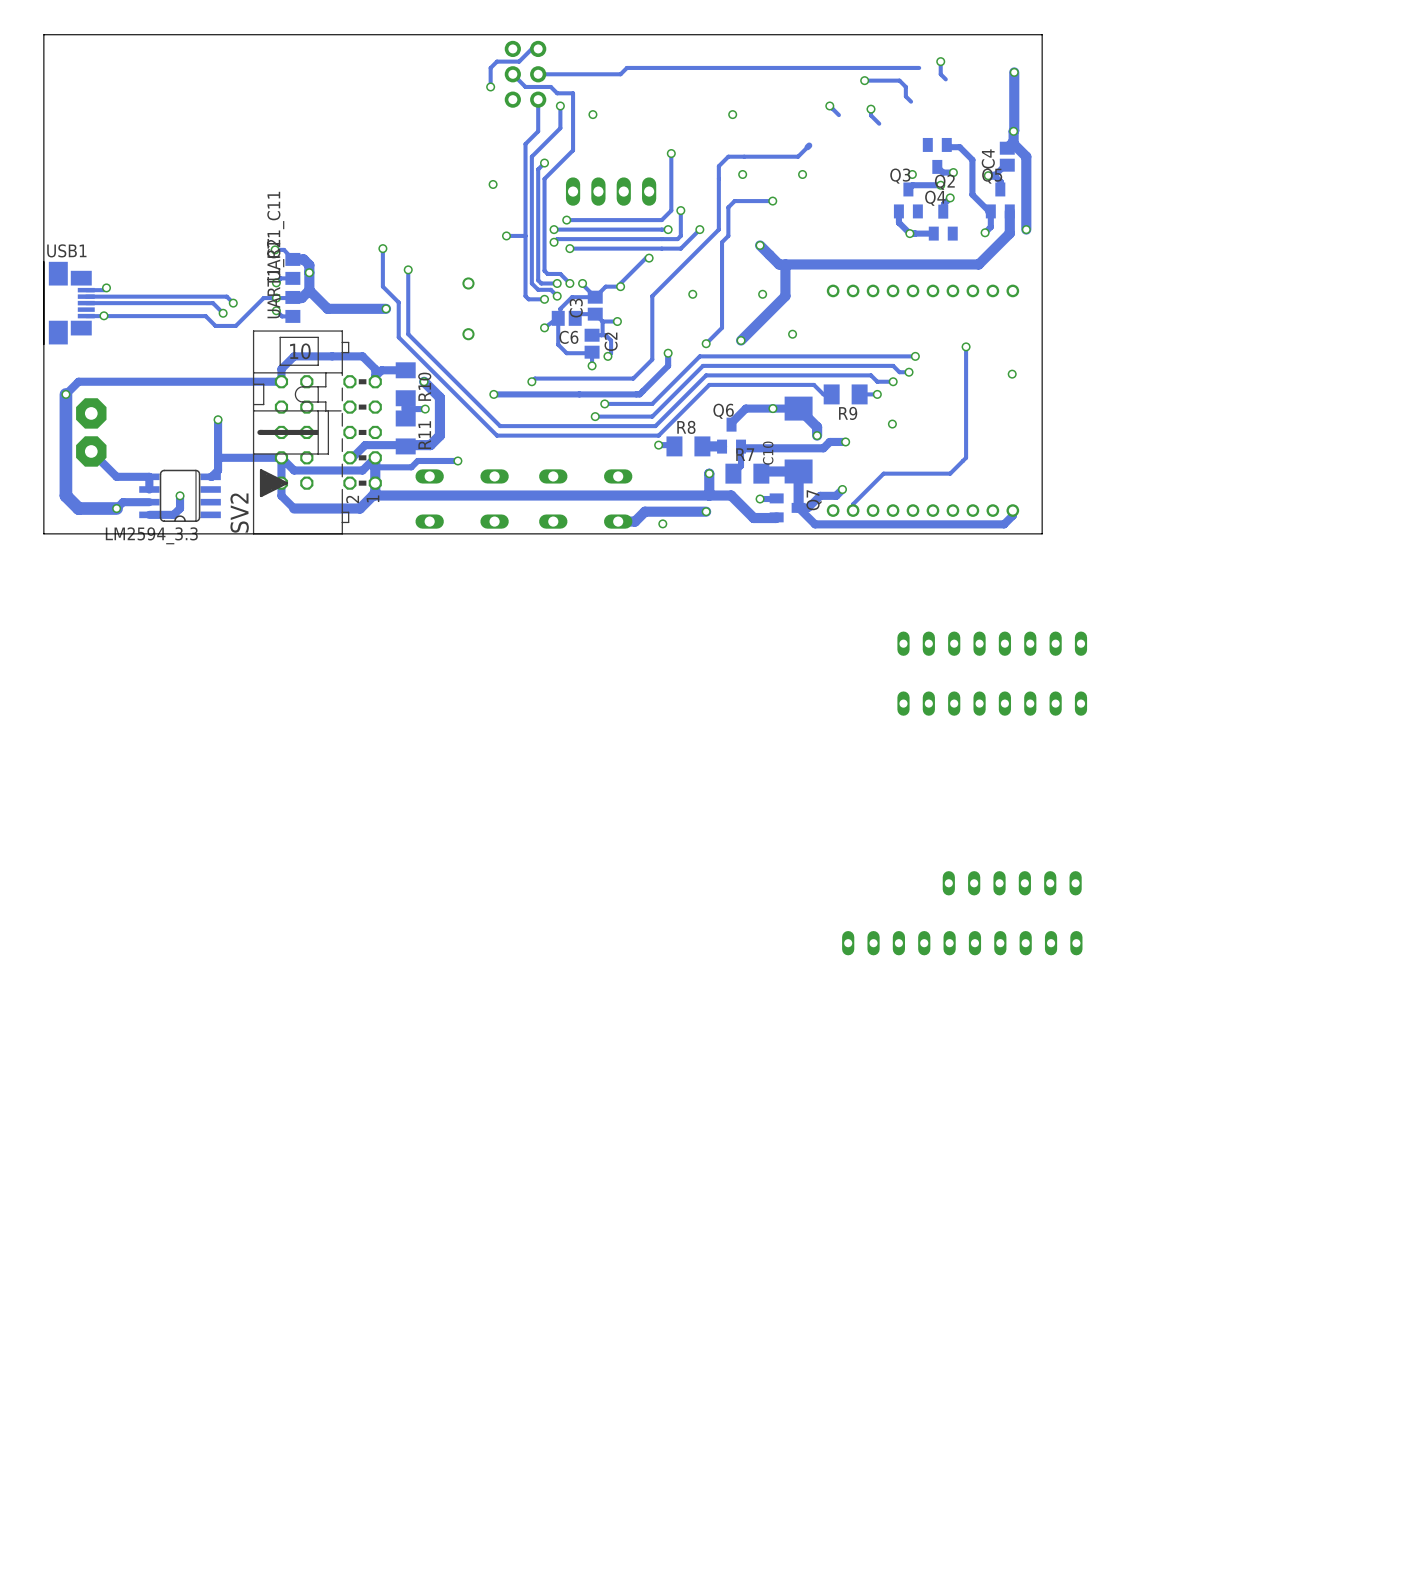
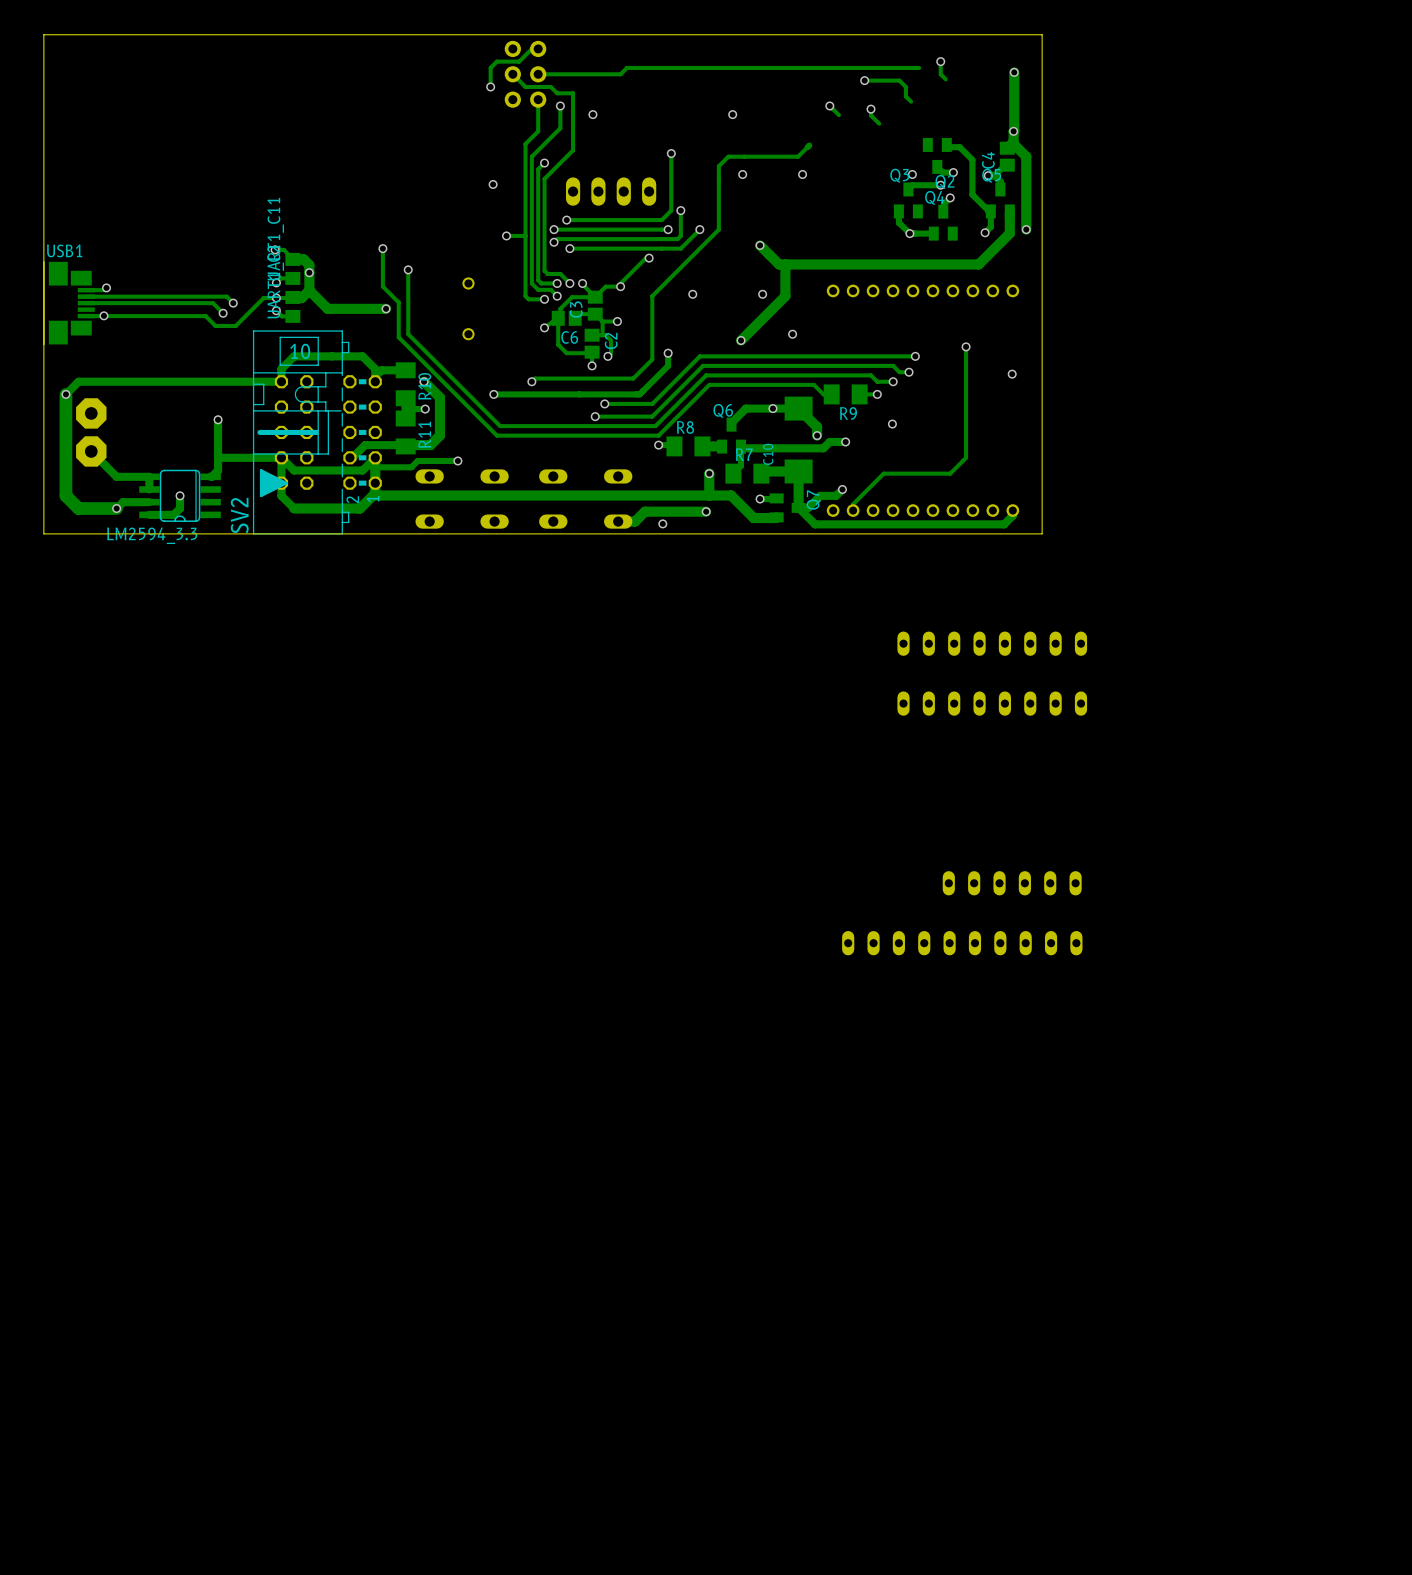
track: (772, 201) (734, 201) (728, 207) (728, 235) (722, 242) (722, 327) (706, 343) -> none
via: (772, 201) -> none
via: (706, 343) -> none

